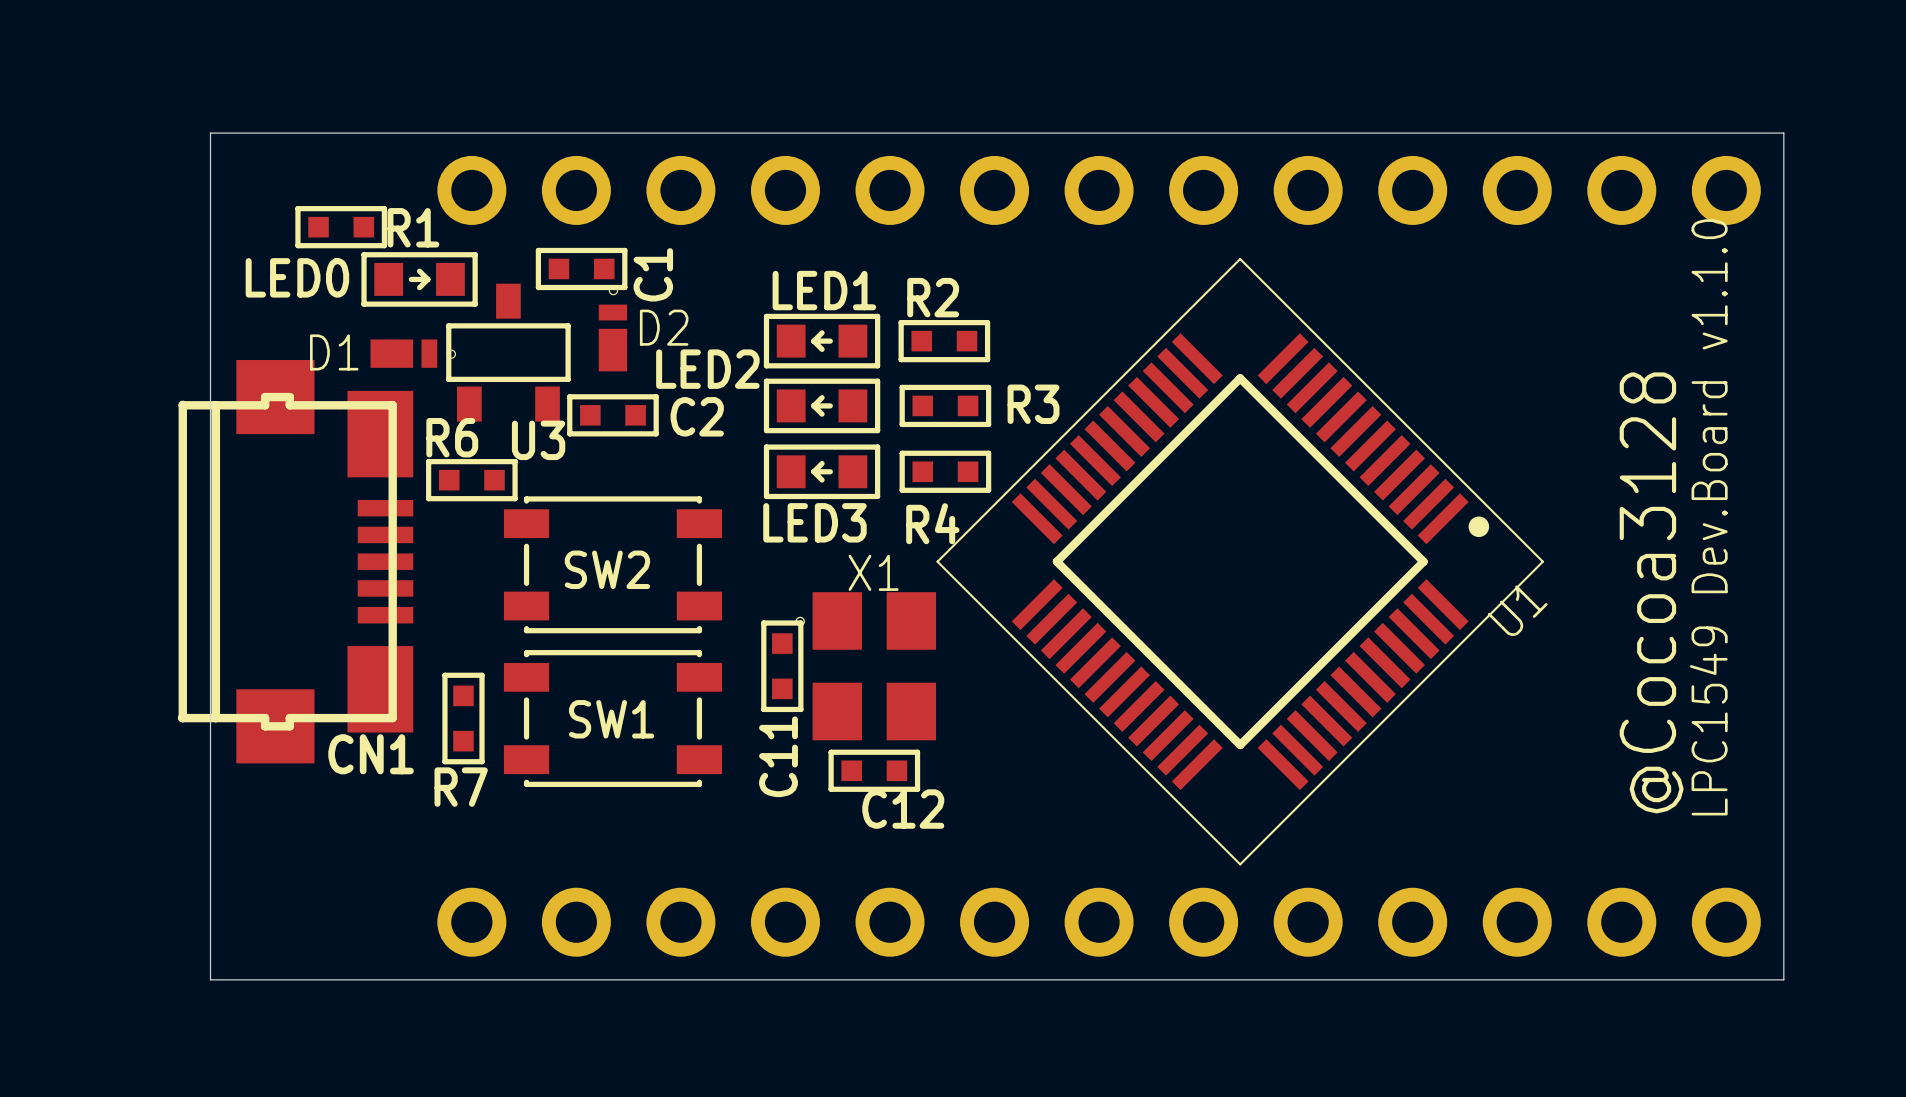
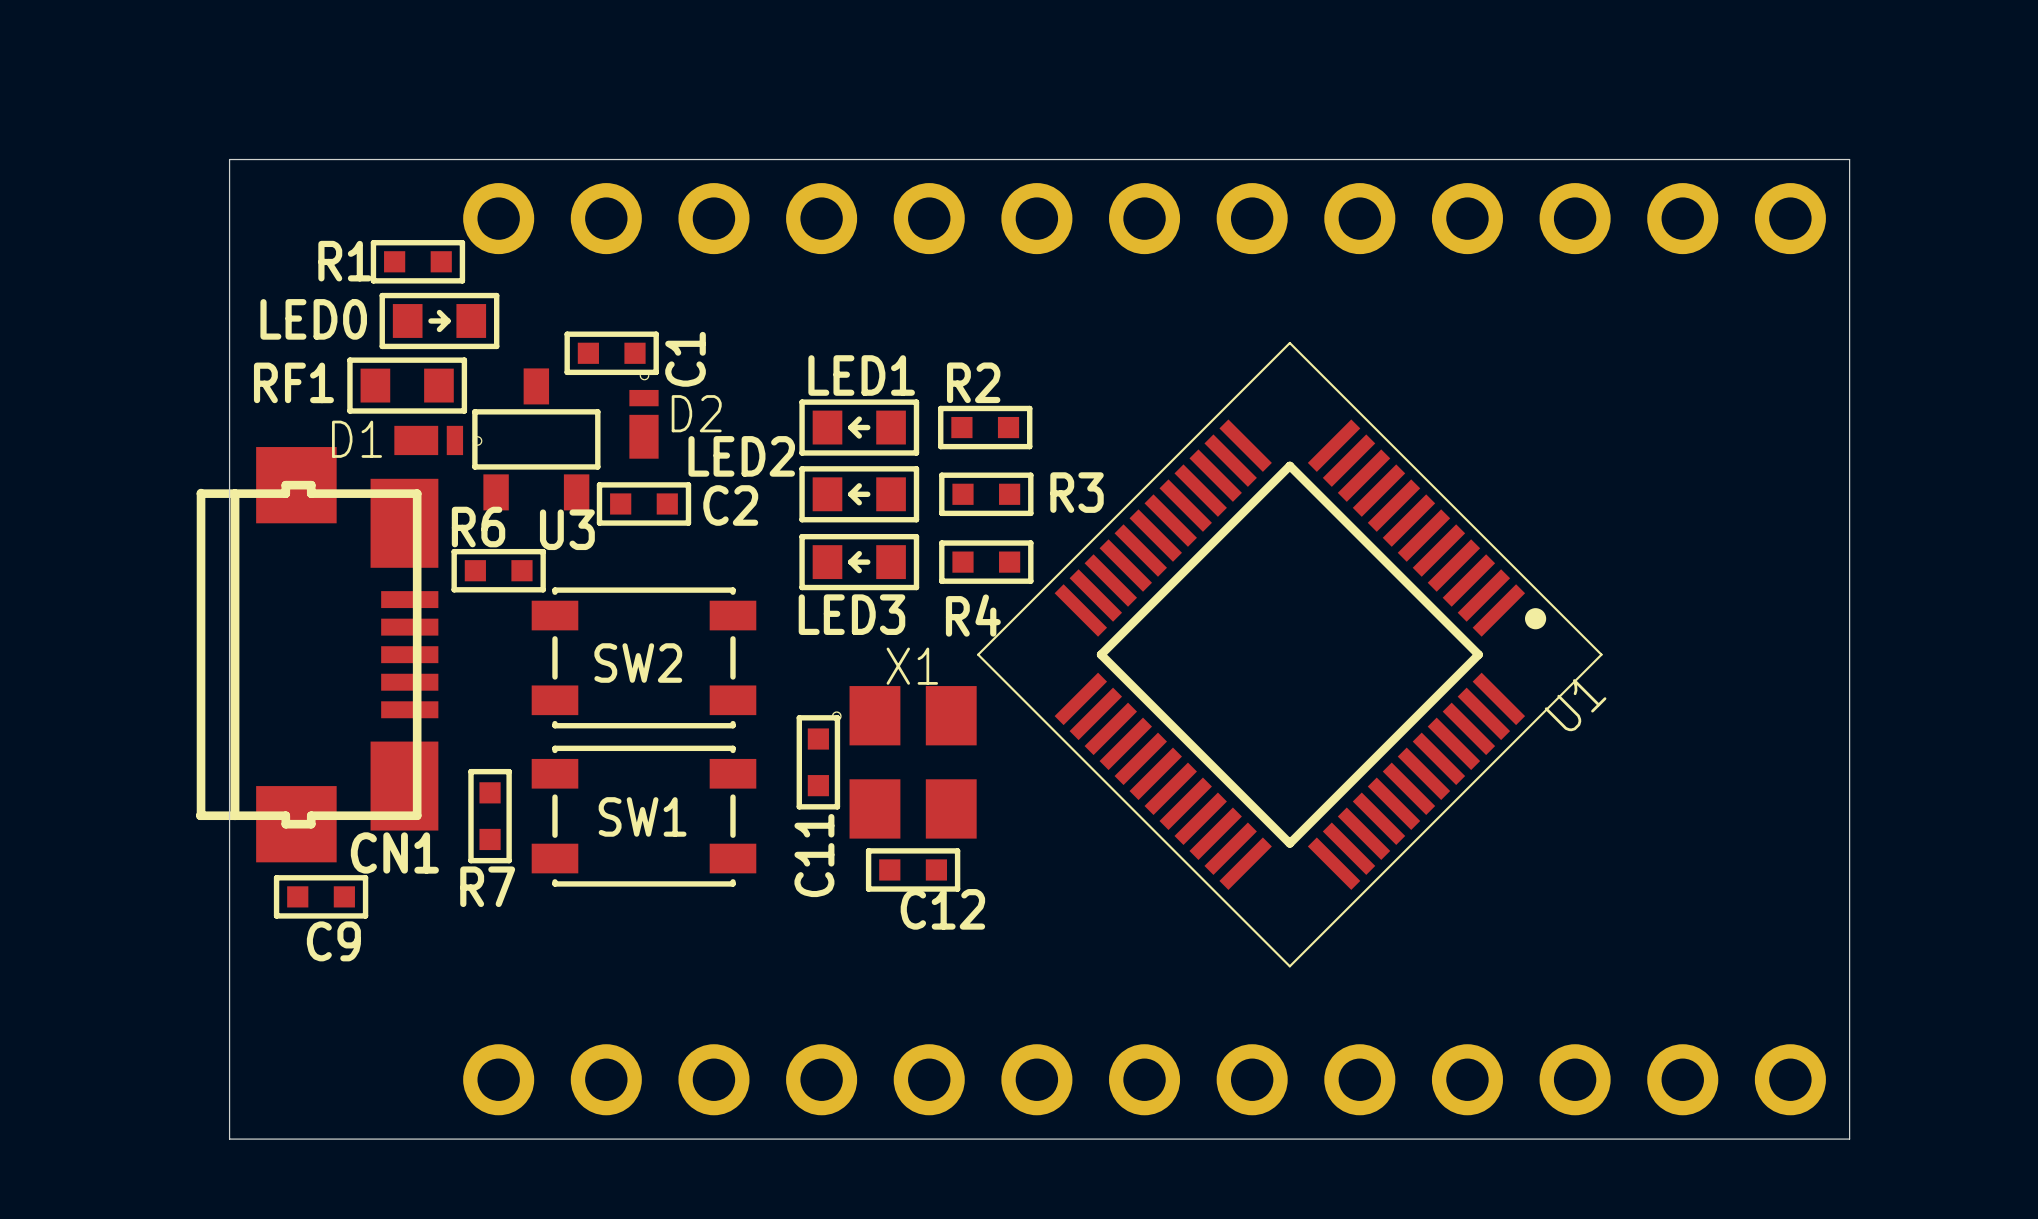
board edge: (210, 133) (1783, 133) -> (229, 213) (229, 159) (1849, 159) (1849, 213)
part position: (1099, 190) -> (1144, 218)
R1 position: (341, 227) -> (417, 261)
R1 name position: R1 (413, 227) -> R1 (345, 261)
LED0 position: (419, 279) -> (439, 320)
RF1: none -> (407, 385)
text: LPC1549 Dev.Board v1.1.0 (1708, 517) -> none
text: @Cocoa3128 (1651, 592) -> none
C9: none -> (321, 896)
part position: (1099, 922) -> (1144, 1079)
board edge: (210, 979) (1783, 979) -> (229, 1085) (229, 1139) (1849, 1139) (1849, 1085)

